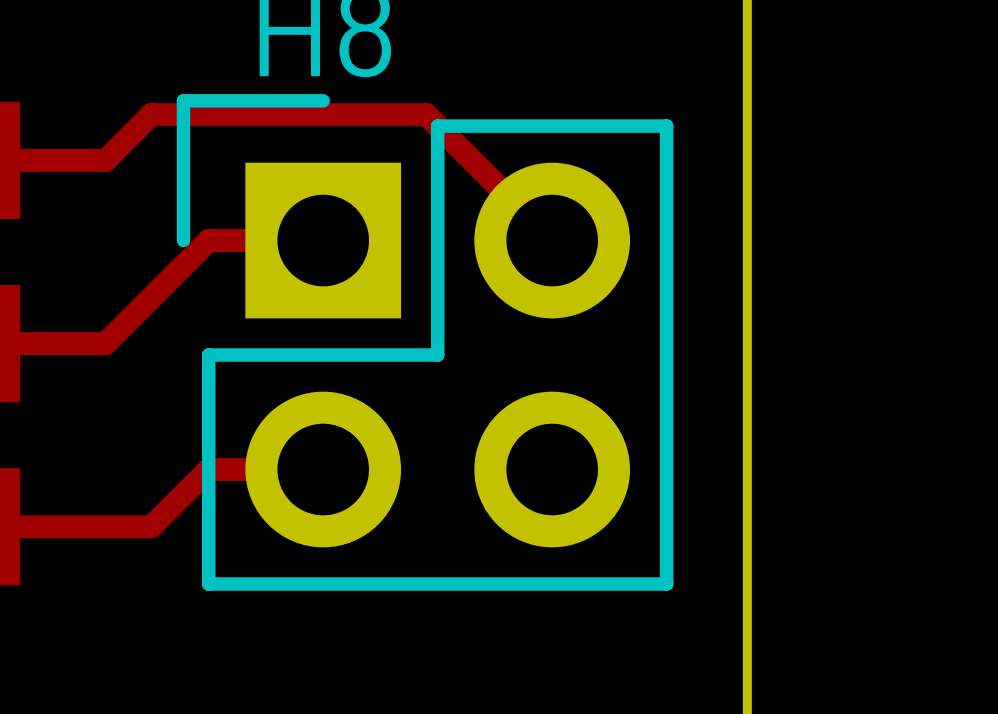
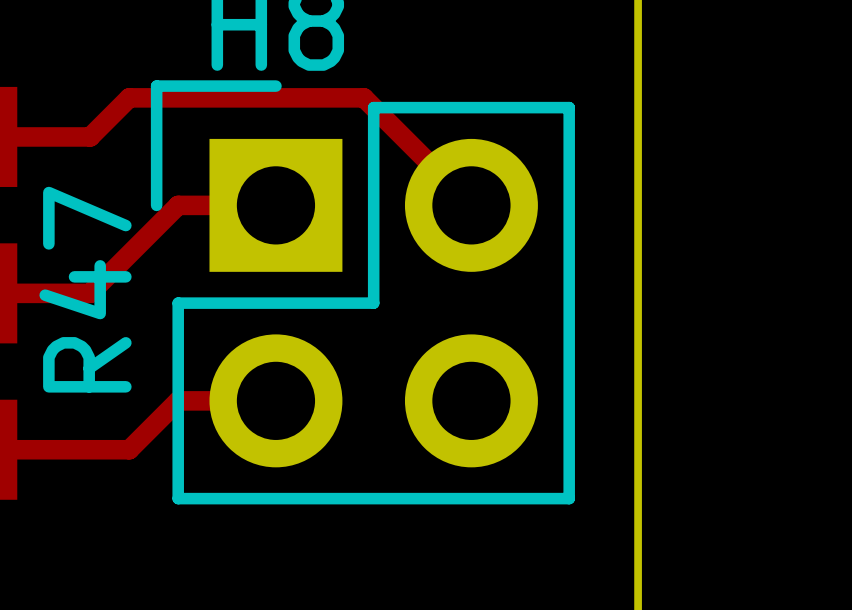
R47 name: none -> R47 (85, 289)

